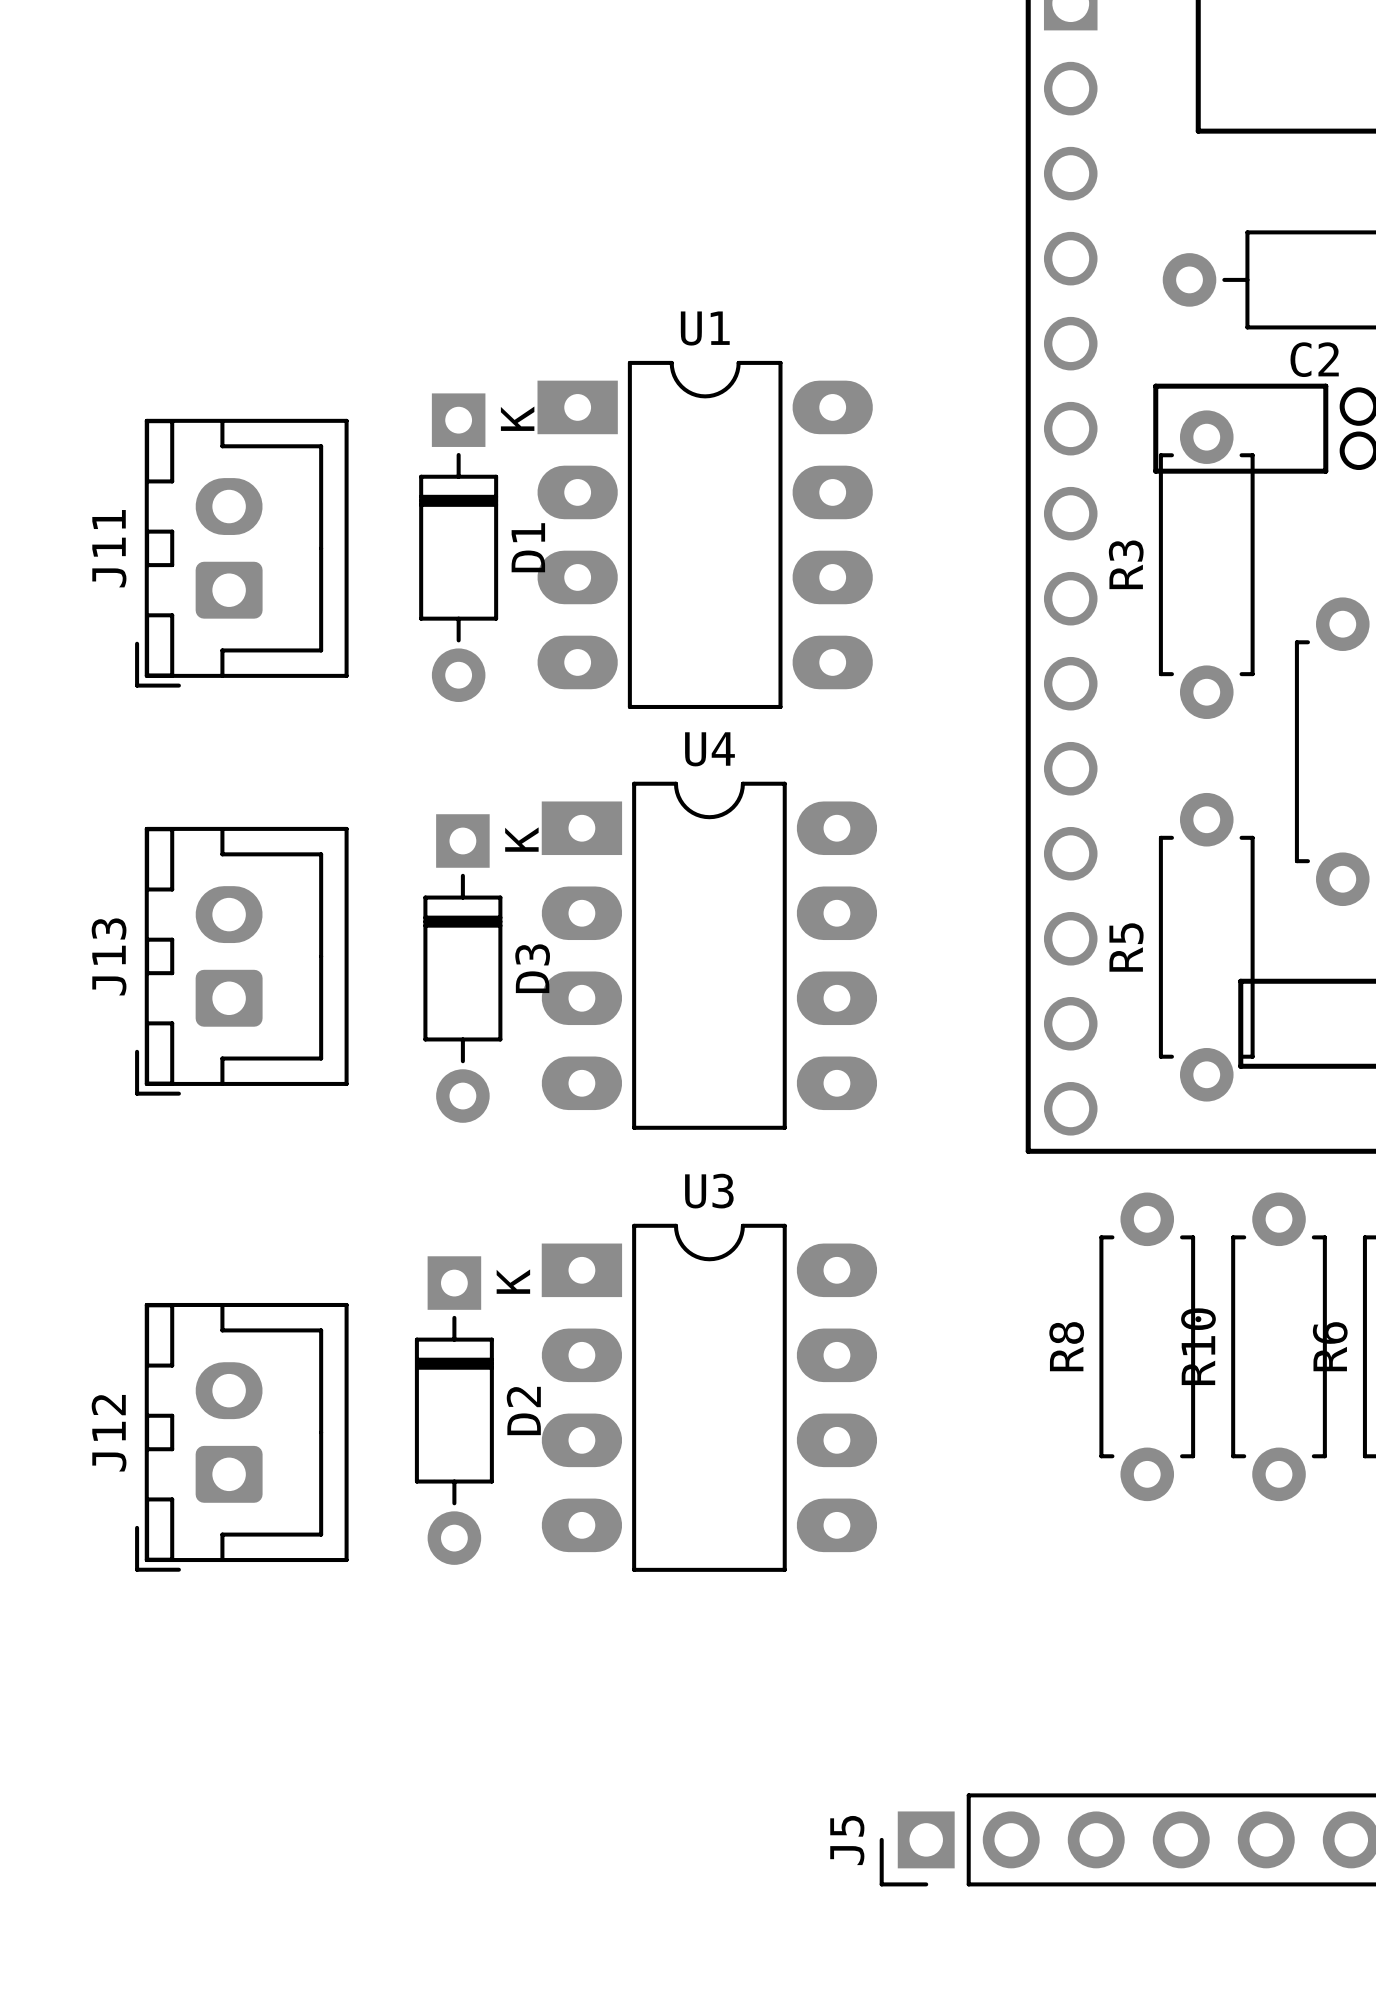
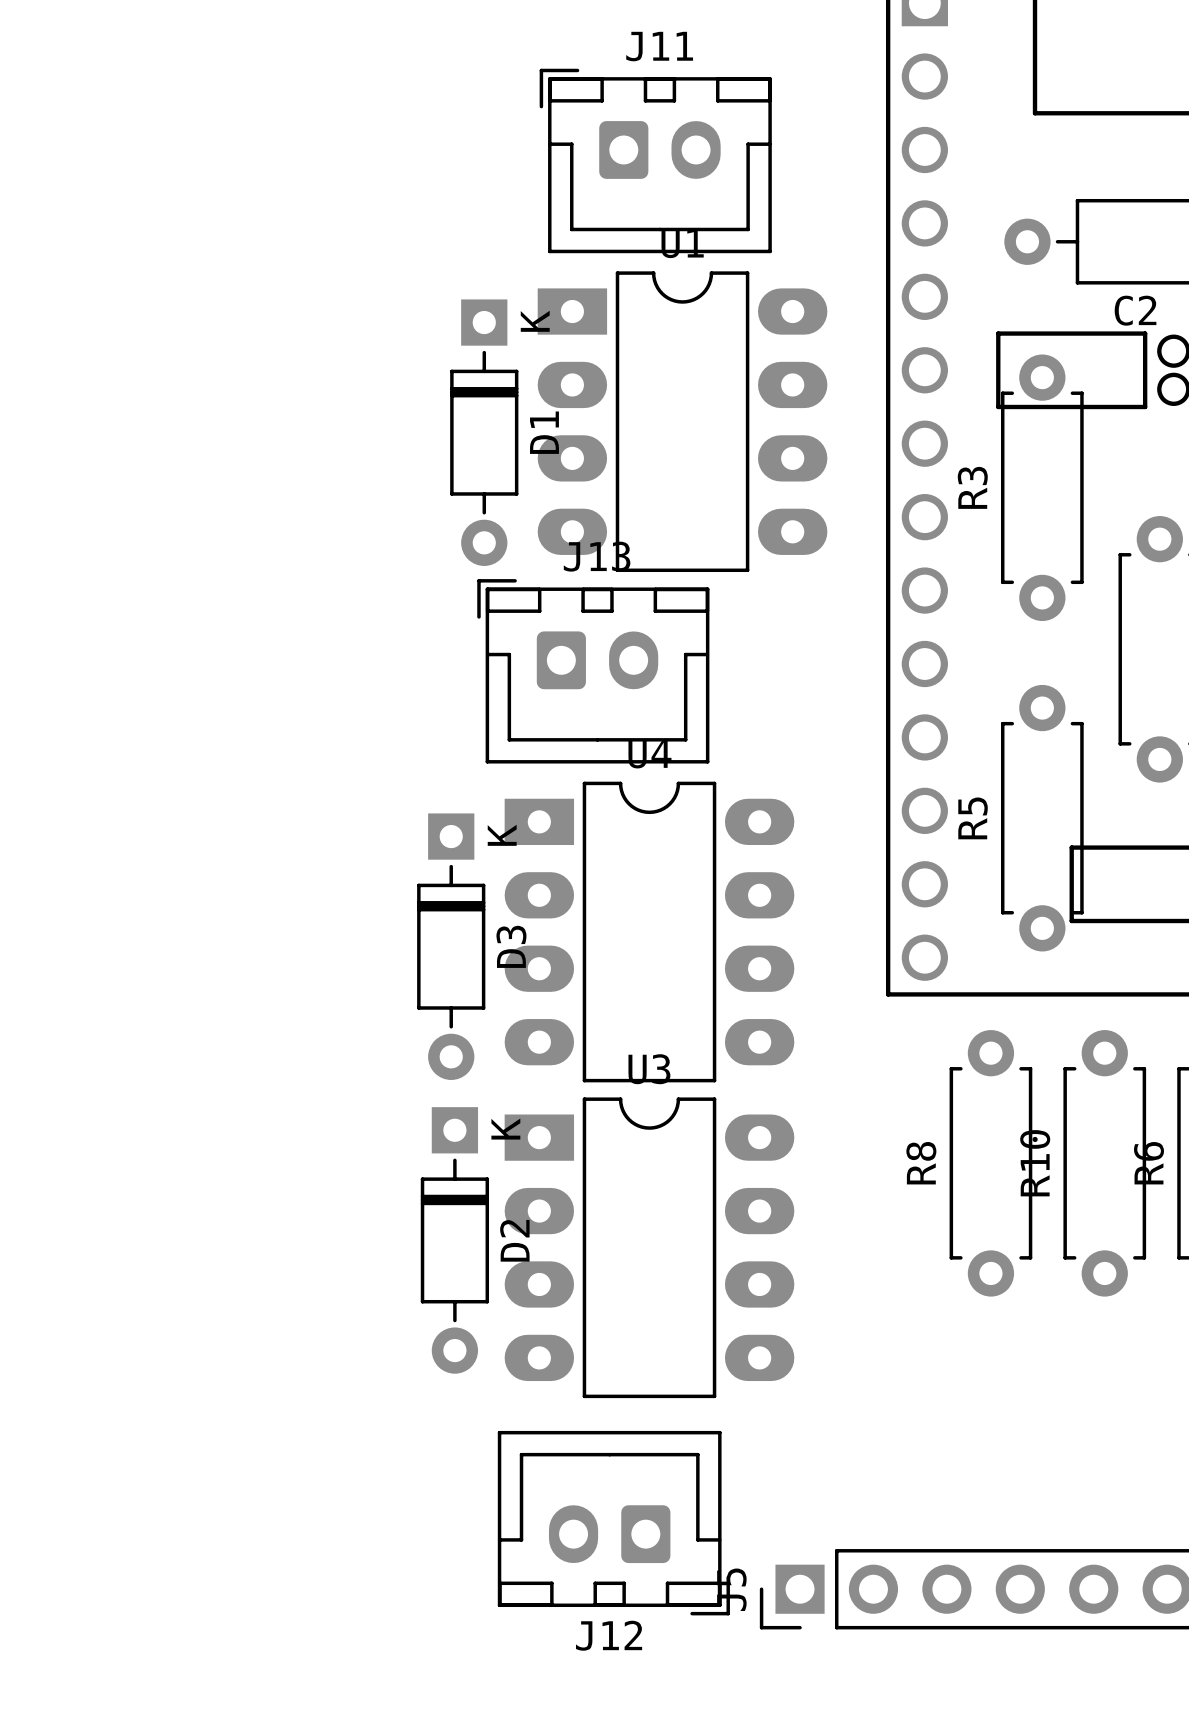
U1 position: (705, 534) -> (682, 421)
D1 position: (458, 547) -> (484, 432)
J11 rotation: 0° (241, 553) -> 90° clockwise (655, 160)
J11 position: (241, 553) -> (655, 160)
U4 position: (709, 955) -> (649, 932)
J13 rotation: 0° (241, 961) -> 90° clockwise (593, 671)
J13 position: (241, 961) -> (593, 671)
D3 position: (462, 968) -> (451, 946)
U3 position: (709, 1397) -> (649, 1247)
D2 position: (454, 1410) -> (454, 1240)
J12 rotation: 0° (241, 1437) -> 90° counterclockwise (613, 1523)
J12 position: (241, 1437) -> (613, 1523)

